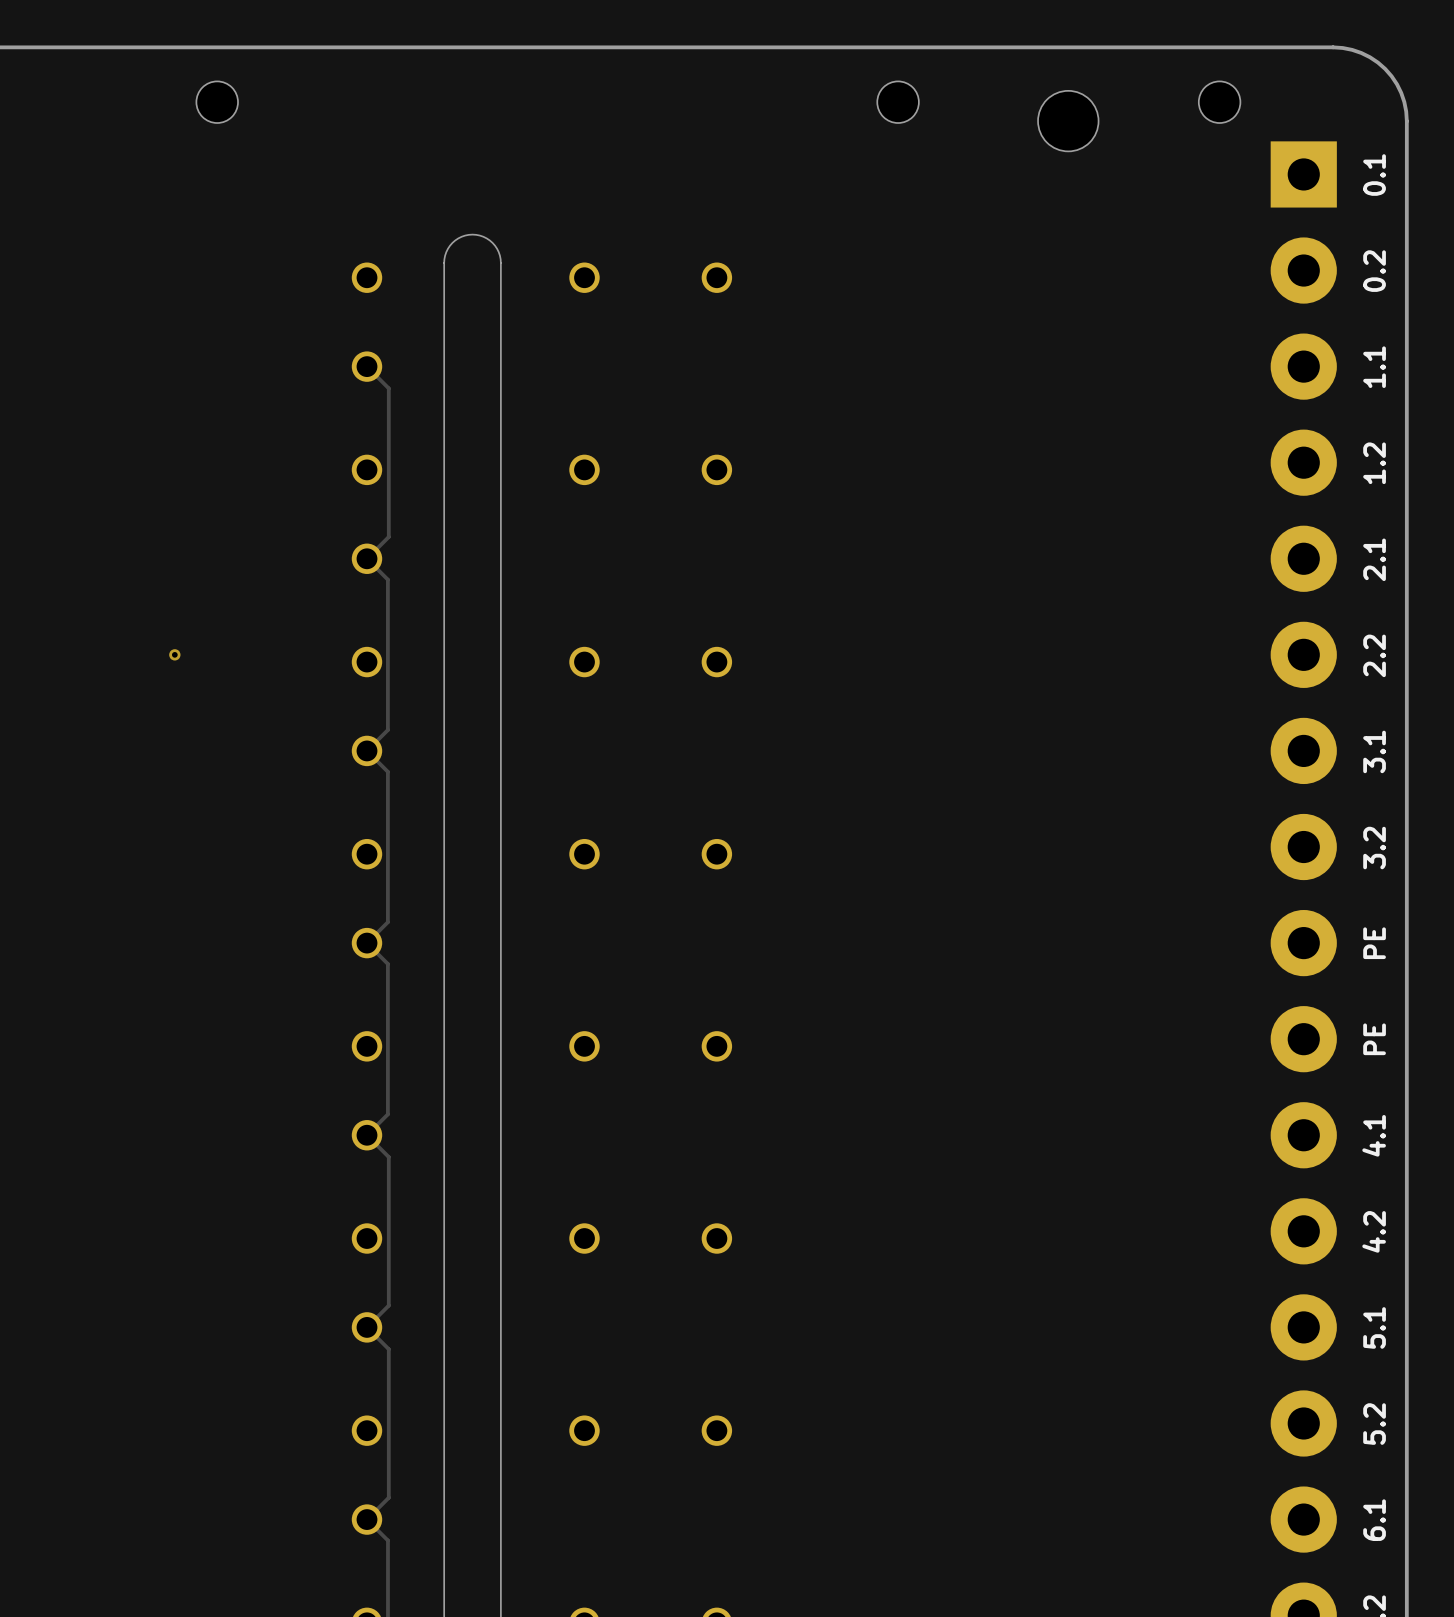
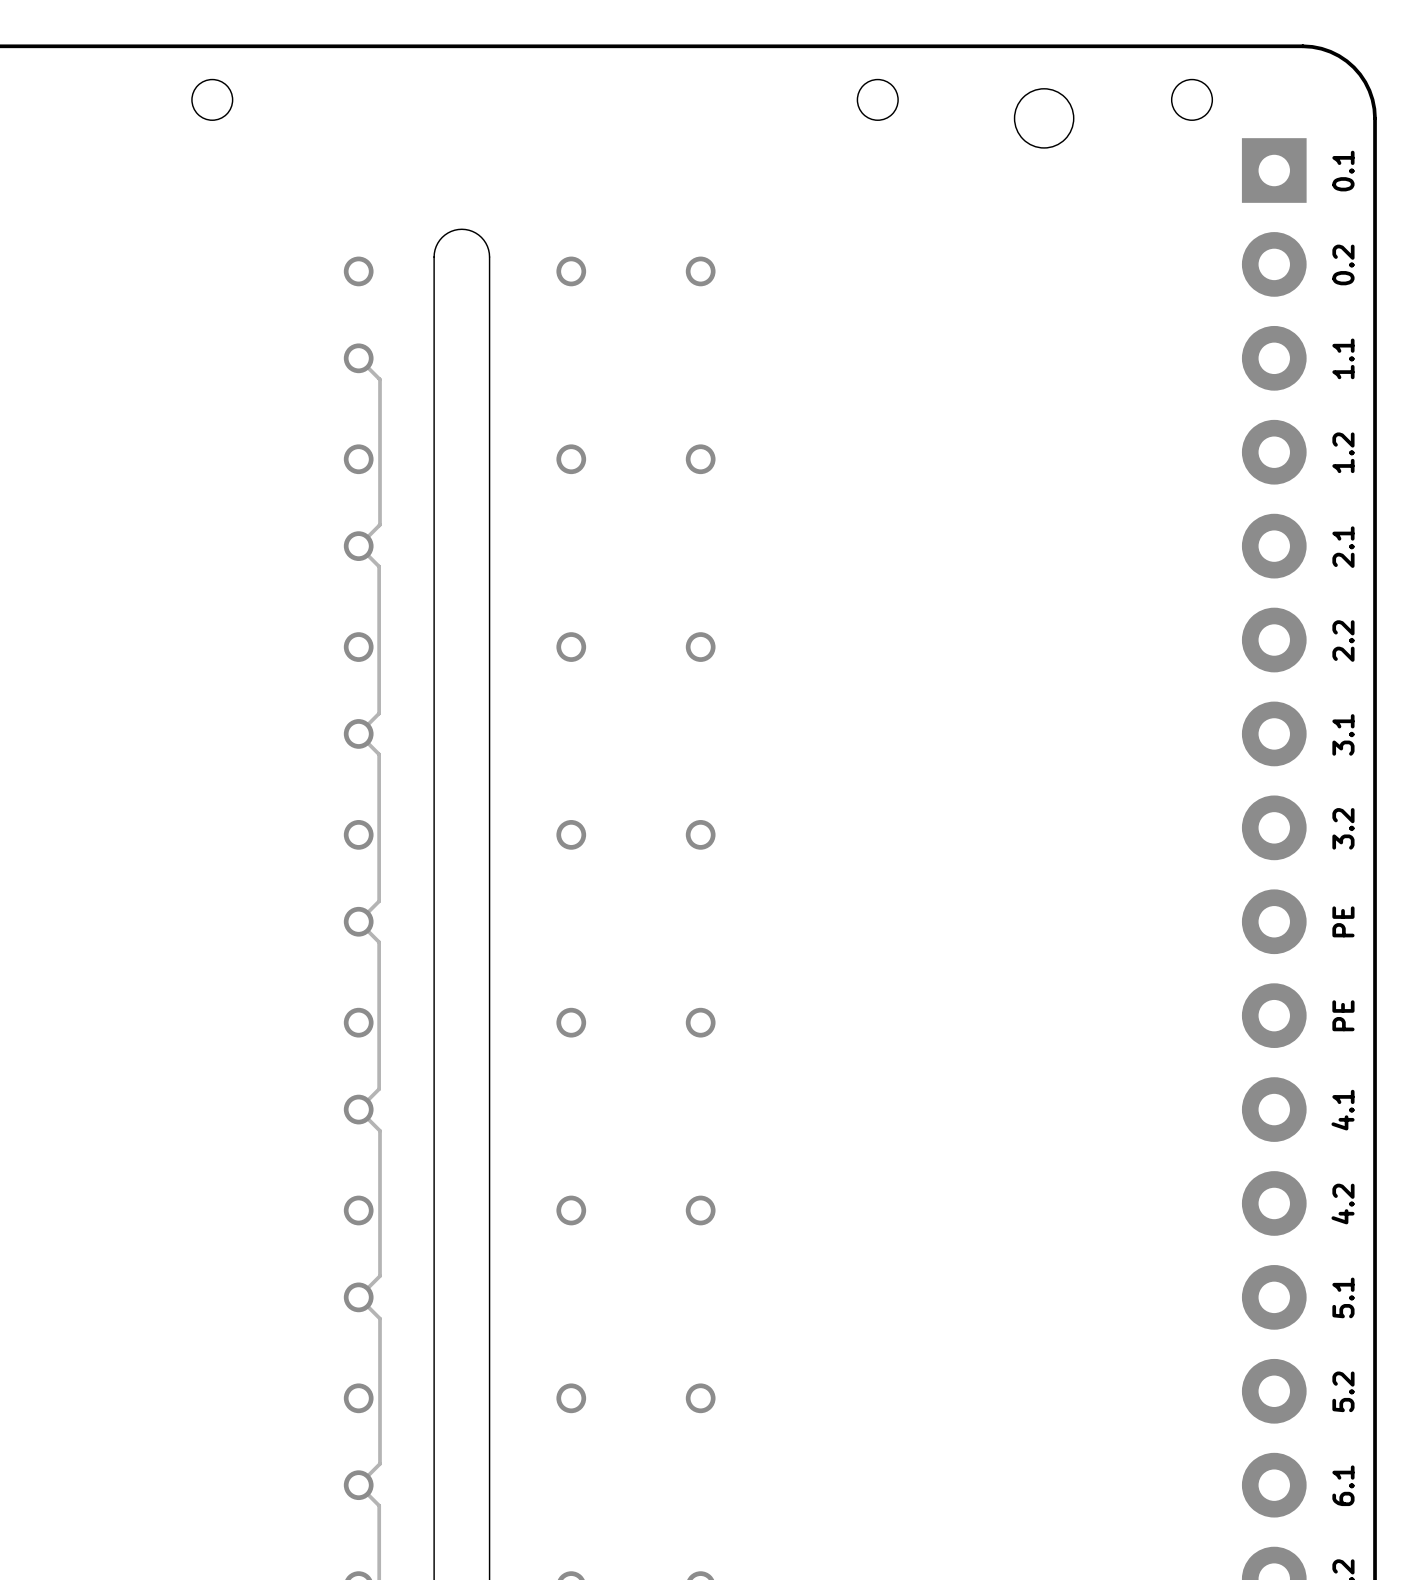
via: (174, 654) -> none

